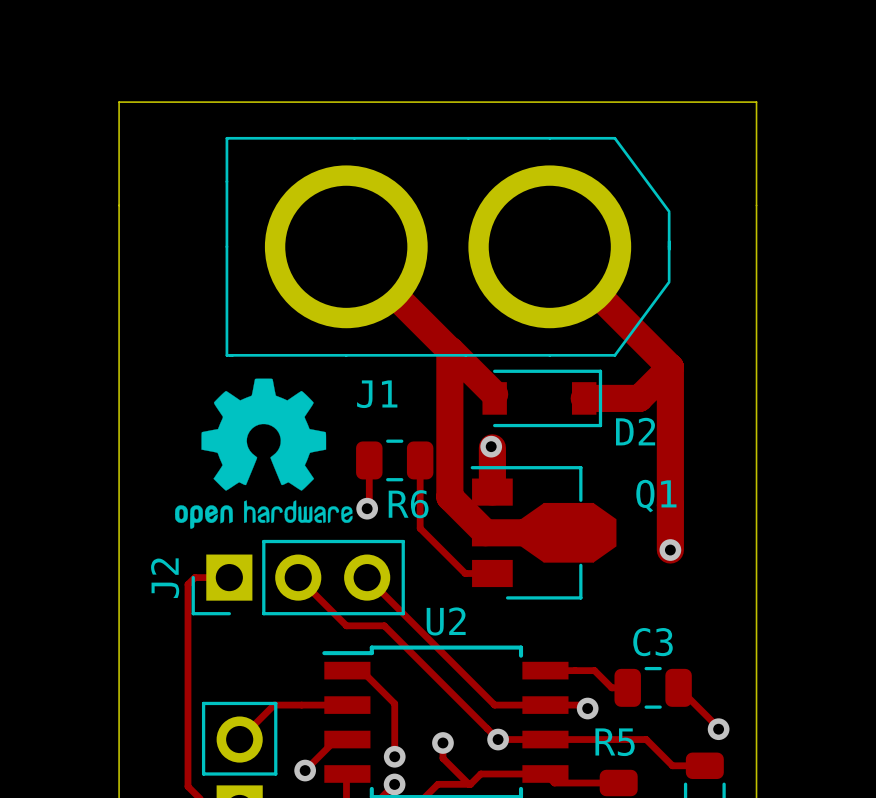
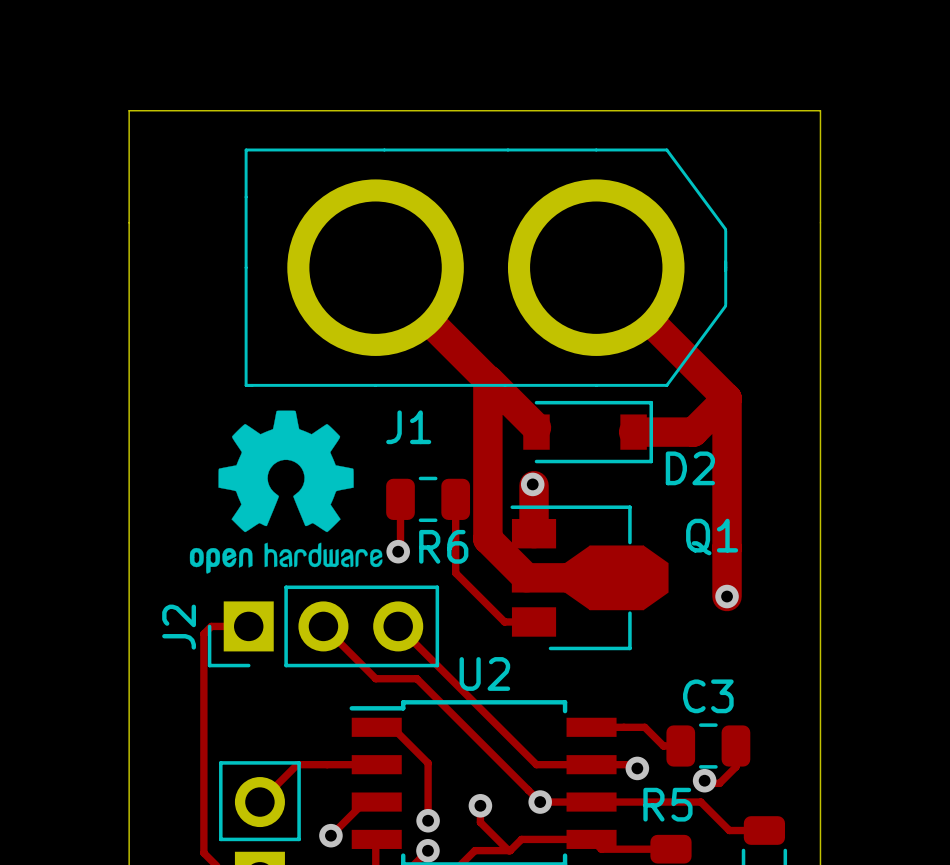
track: (678, 687) (718, 729) -> (735, 745) (735, 766) (719, 783) (701, 783) (704, 780)
via position: (718, 729) -> (704, 780)

